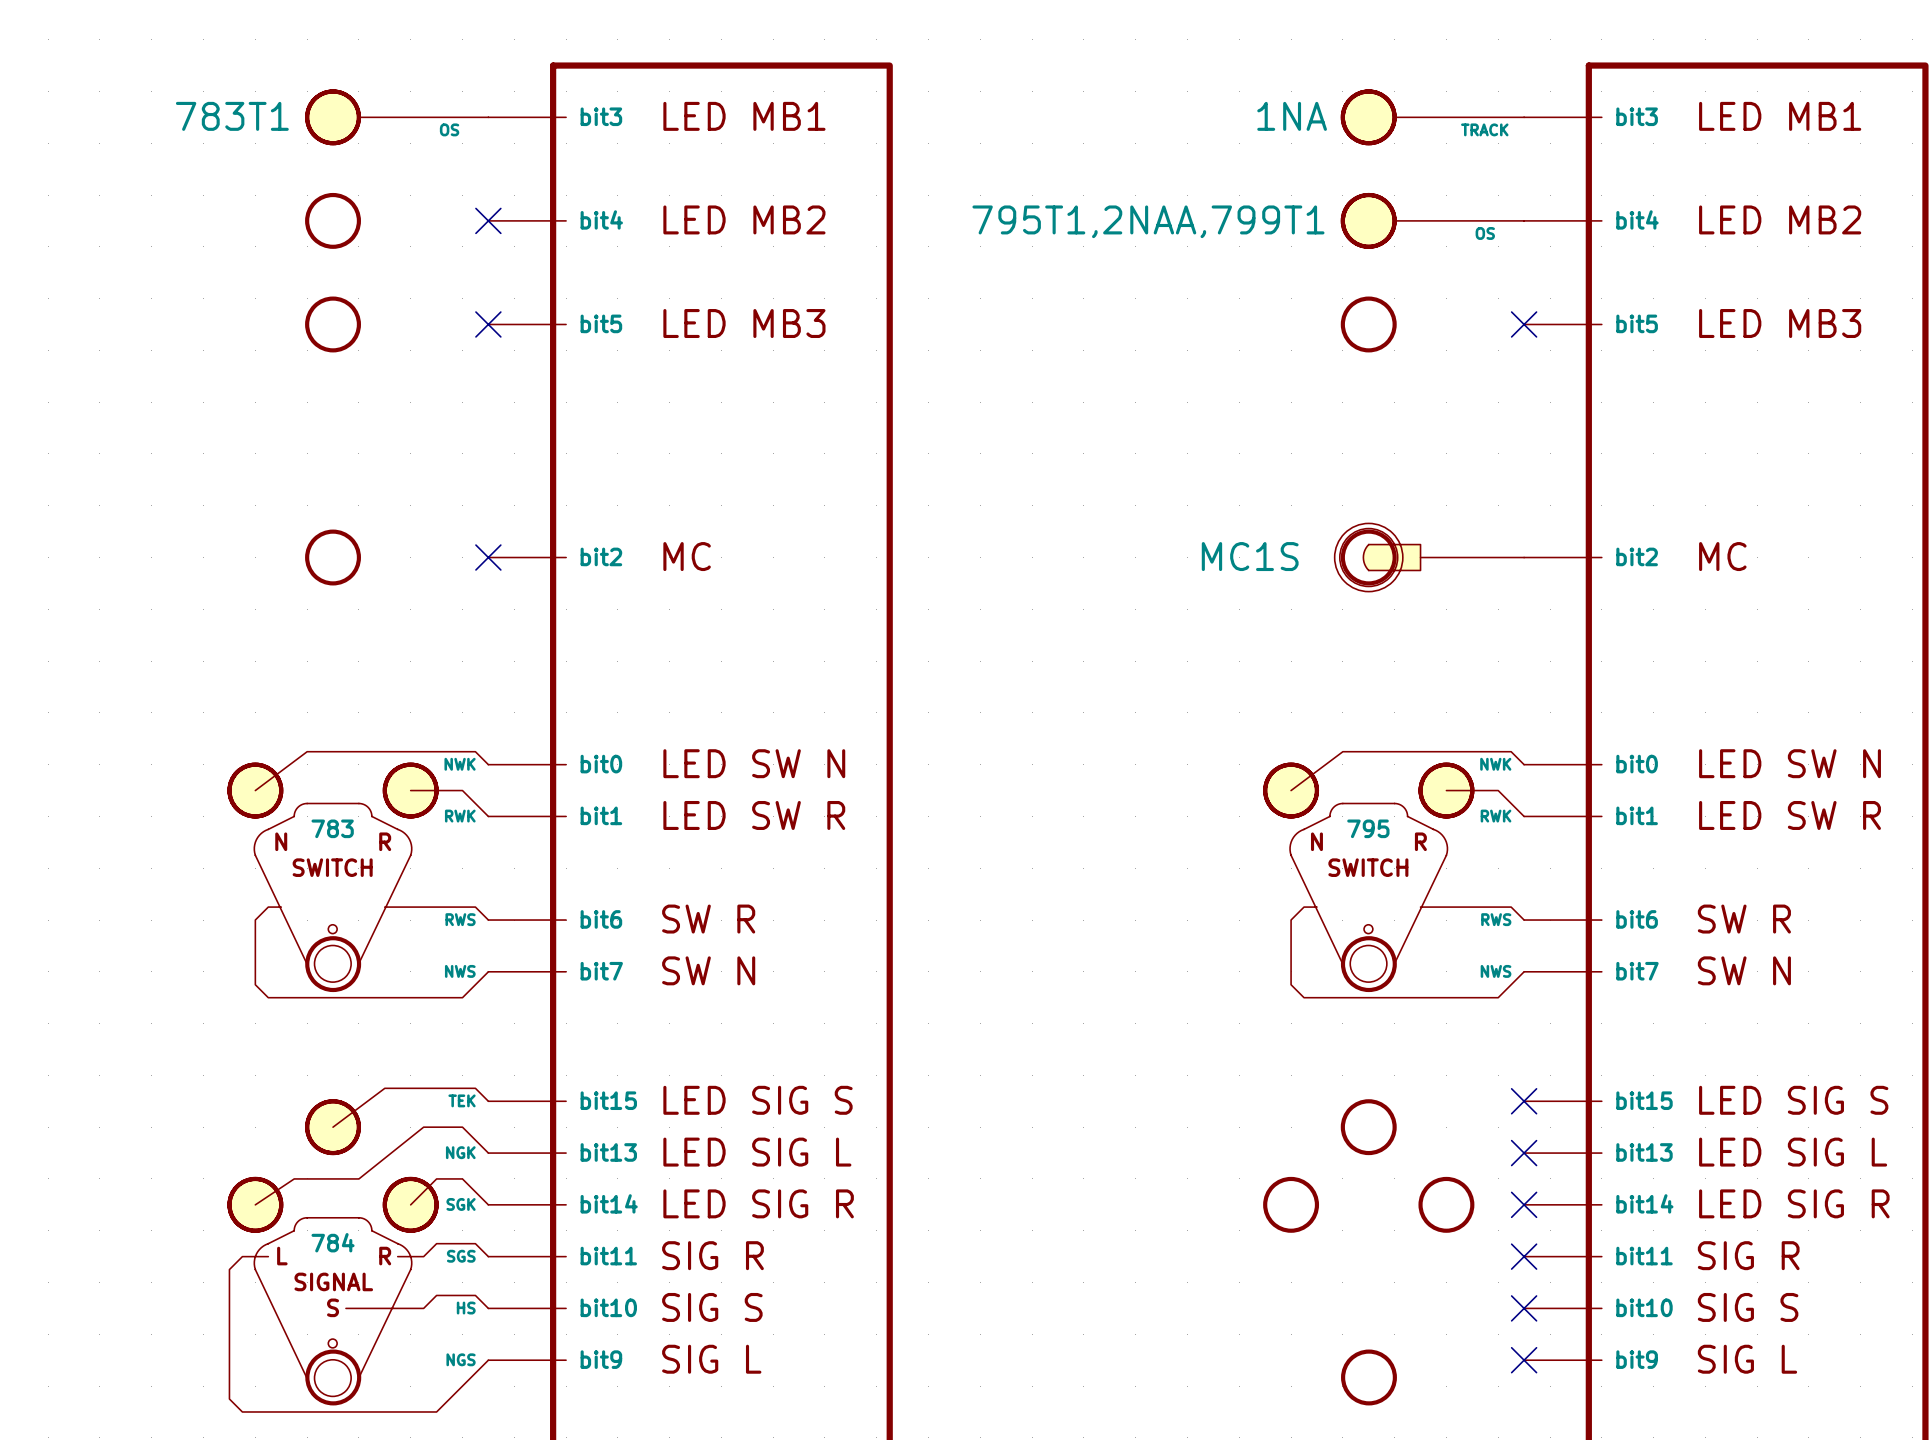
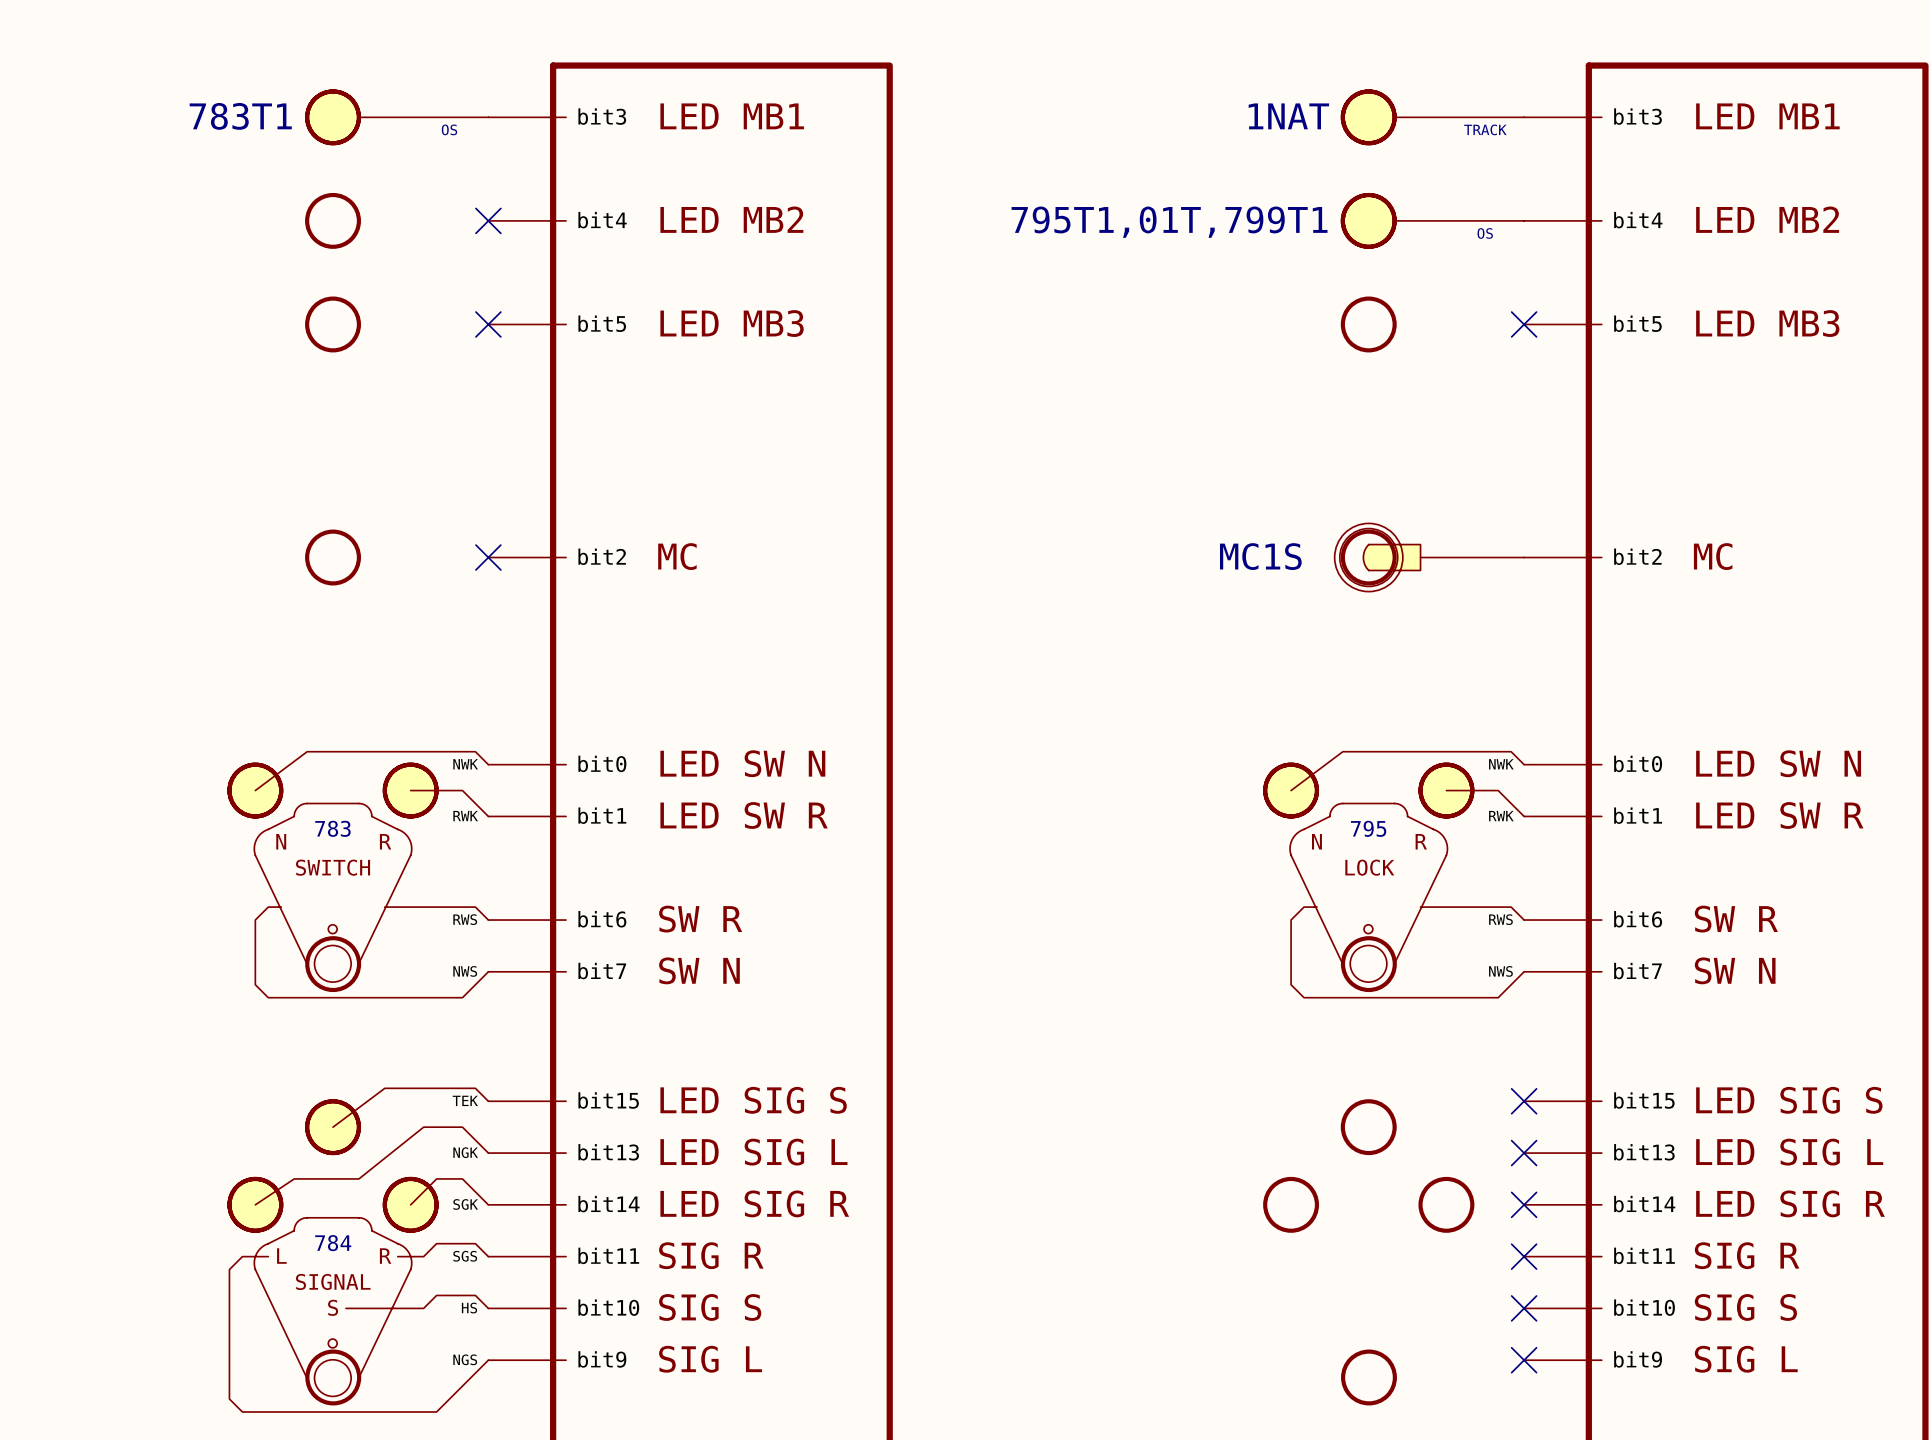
part text: 1NA (1292, 116) -> 1NAT (1288, 116)
part text: 795T1,2NAA,799T1 (1148, 221) -> 795T1,01T,799T1 (1169, 222)
part text: SWITCH (1368, 867) -> LOCK (1369, 867)

